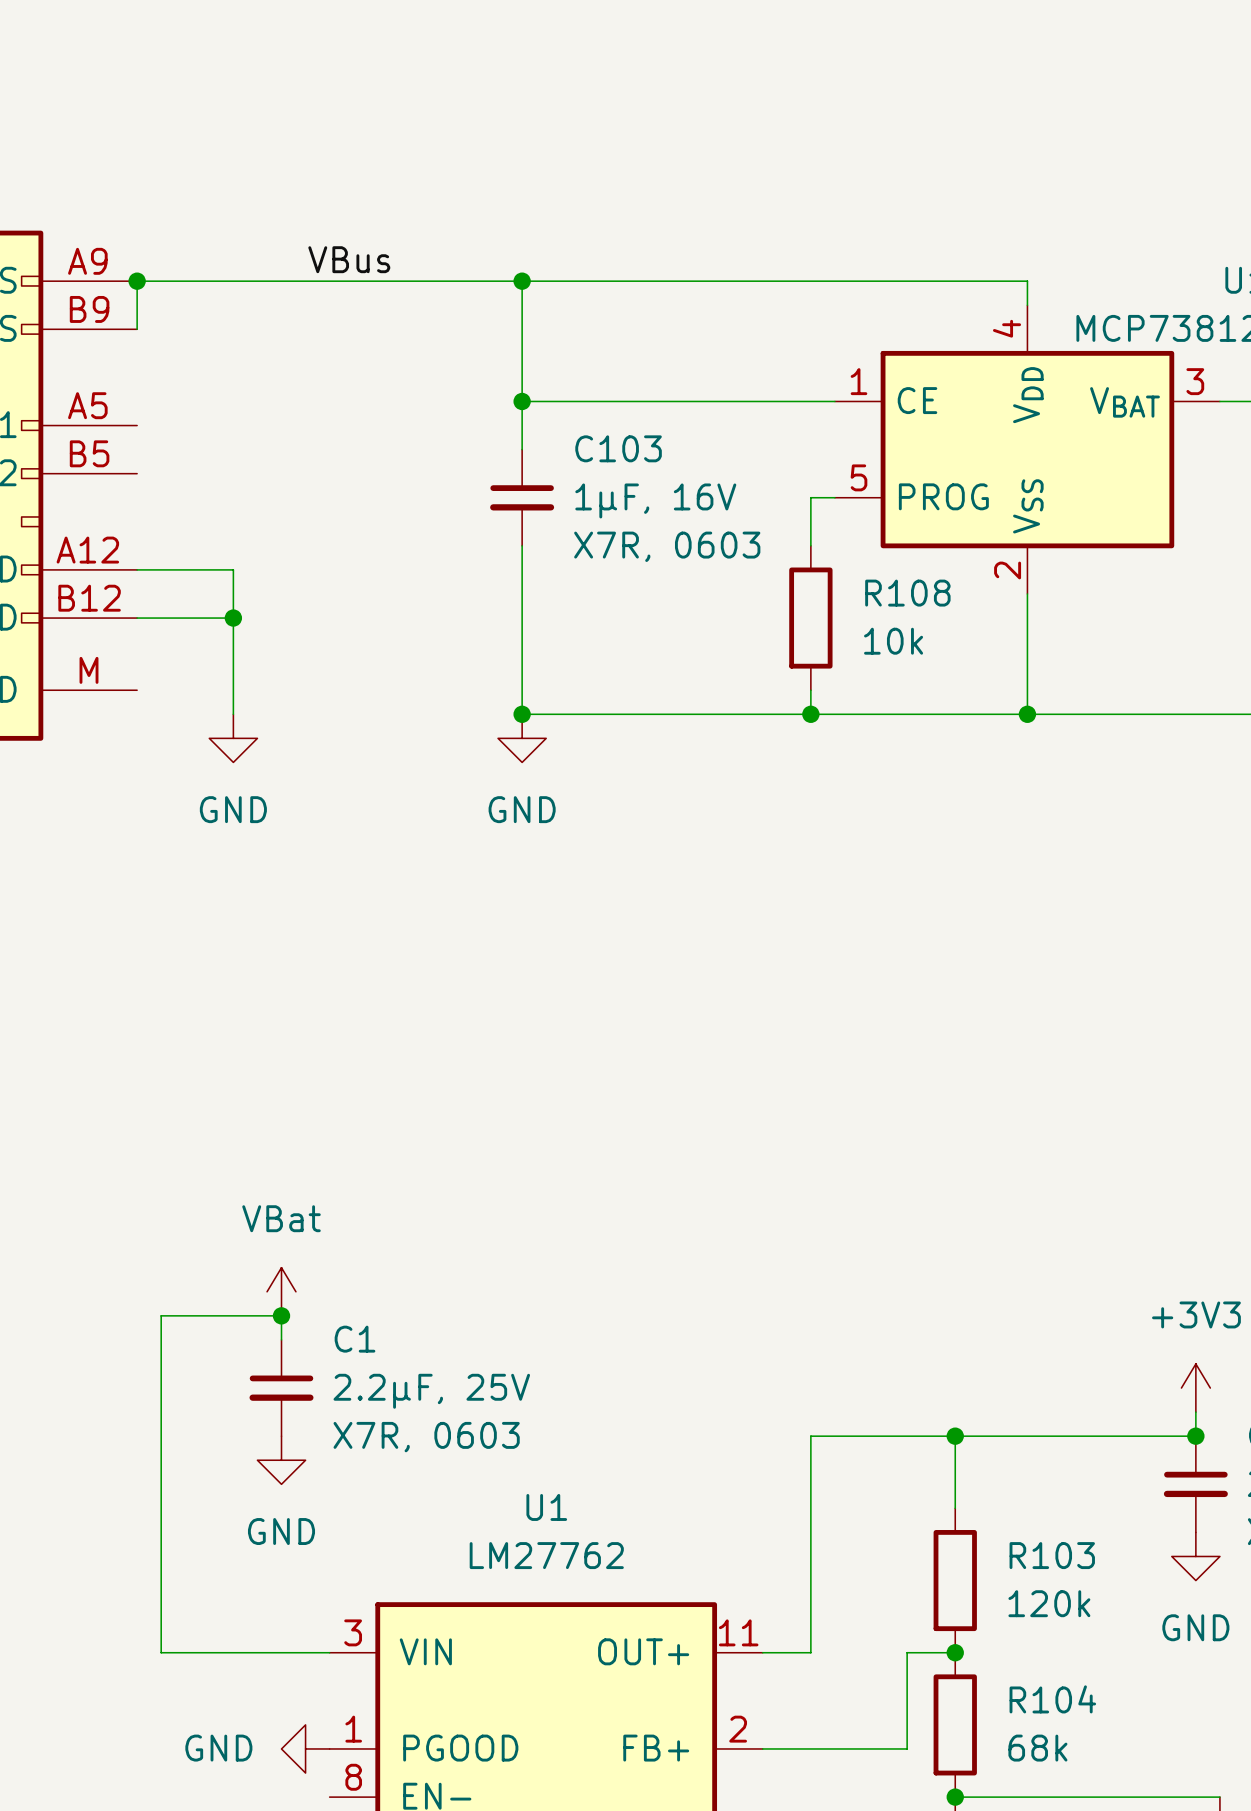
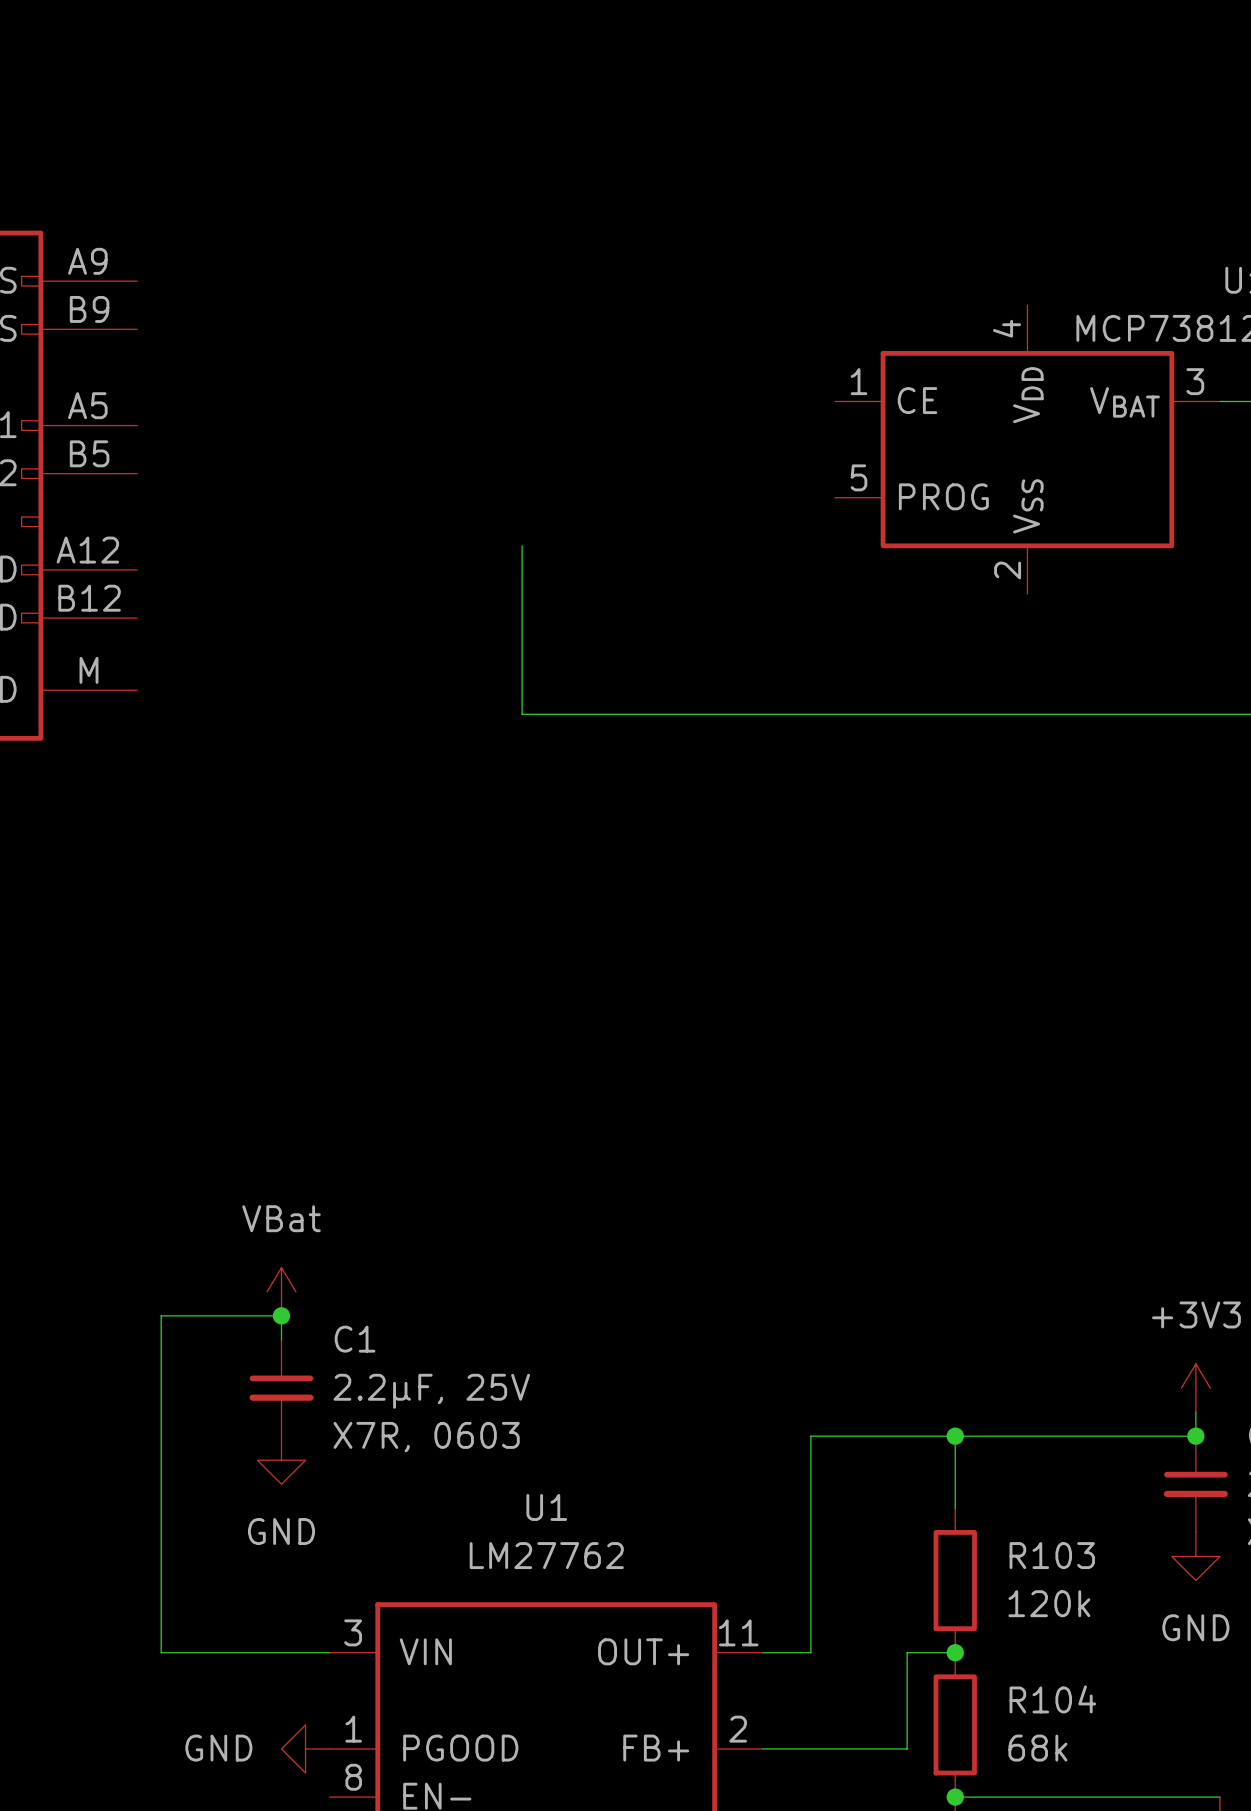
label: VBus (349, 259) -> none
junction: (137, 281) -> none
wire: (522, 281) (522, 449) -> none
junction: (522, 281) -> none
wire: (1027, 305) (1027, 281) (137, 281) (137, 329) -> none
wire: (522, 401) (834, 401) -> none
junction: (522, 401) -> none
C103: (522, 497) -> none
wire: (834, 497) (810, 497) (810, 545) -> none
wire: (137, 569) (233, 569) (233, 714) -> none
wire: (1027, 593) (1027, 714) -> none
wire: (137, 618) (233, 618) -> none
junction: (233, 618) -> none
R108: (810, 618) -> none
wire: (810, 690) (810, 714) -> none
junction: (522, 714) -> none
junction: (810, 714) -> none
junction: (1027, 714) -> none
power symbol: GND (233, 738) -> none
power symbol: GND (522, 738) -> none

